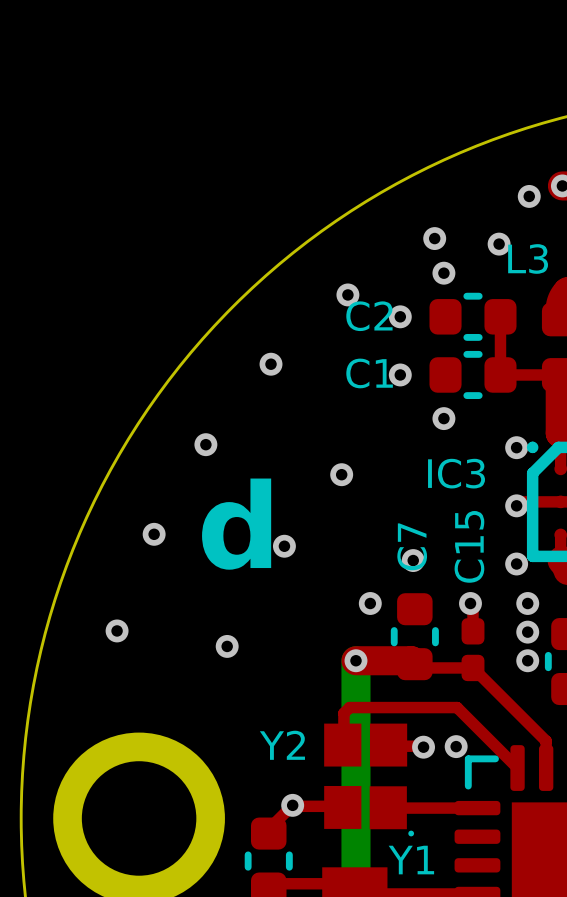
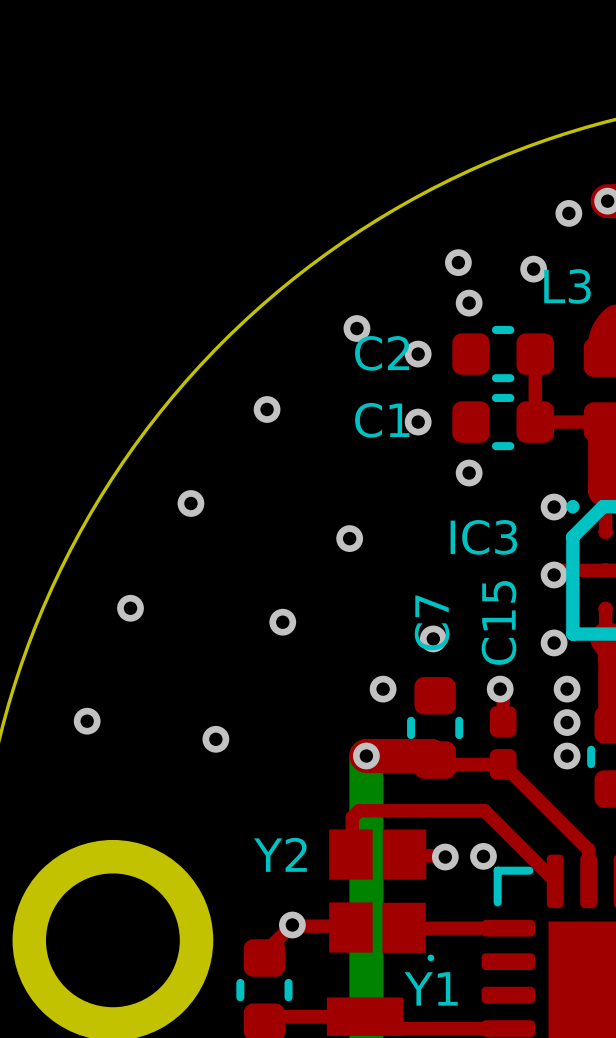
text: d (236, 524) -> none

